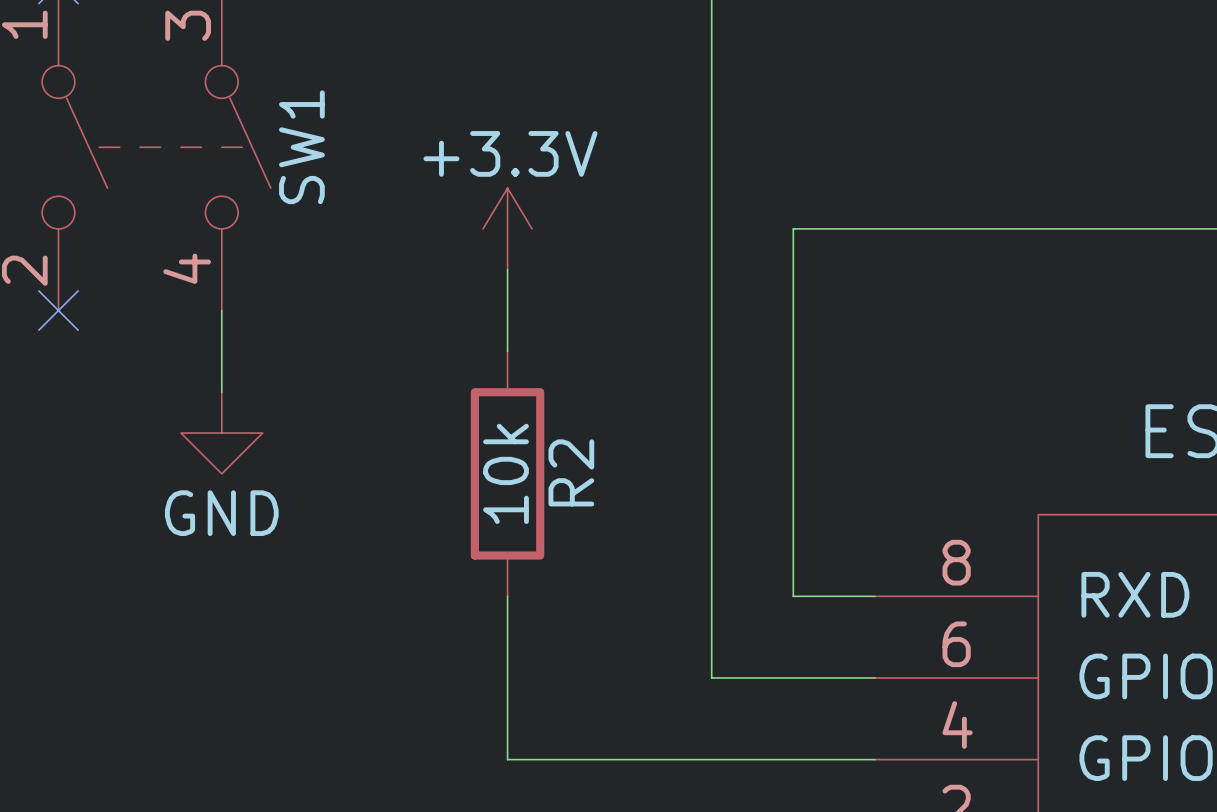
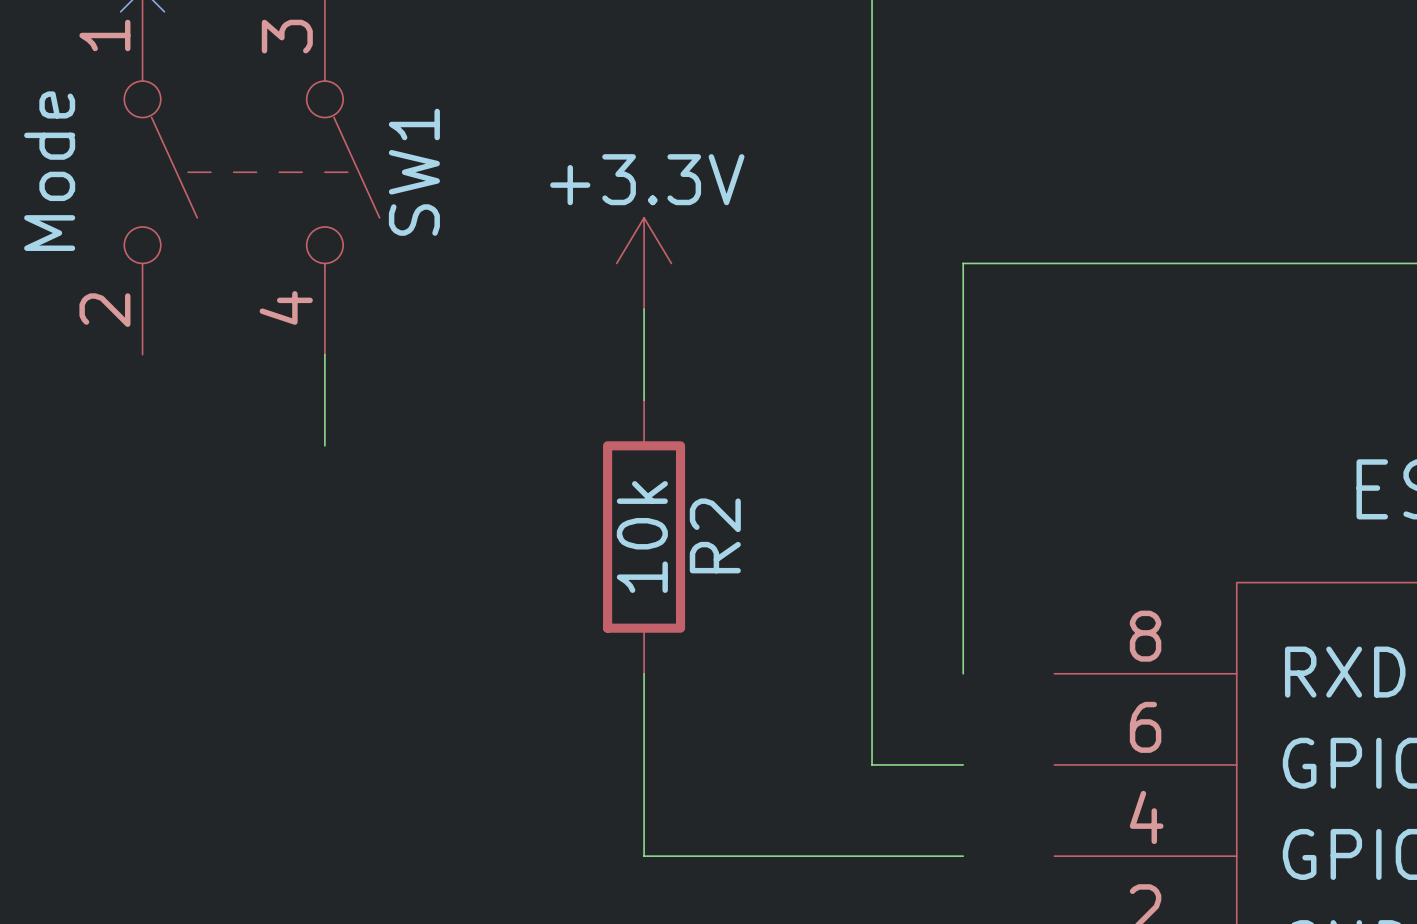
no-connect mark: (58, 310) -> none
power symbol: GND (221, 433) -> none
wire: (793, 596) (874, 596) -> none
wire: (793, 677) (874, 677) -> none
wire: (793, 759) (874, 759) -> none

